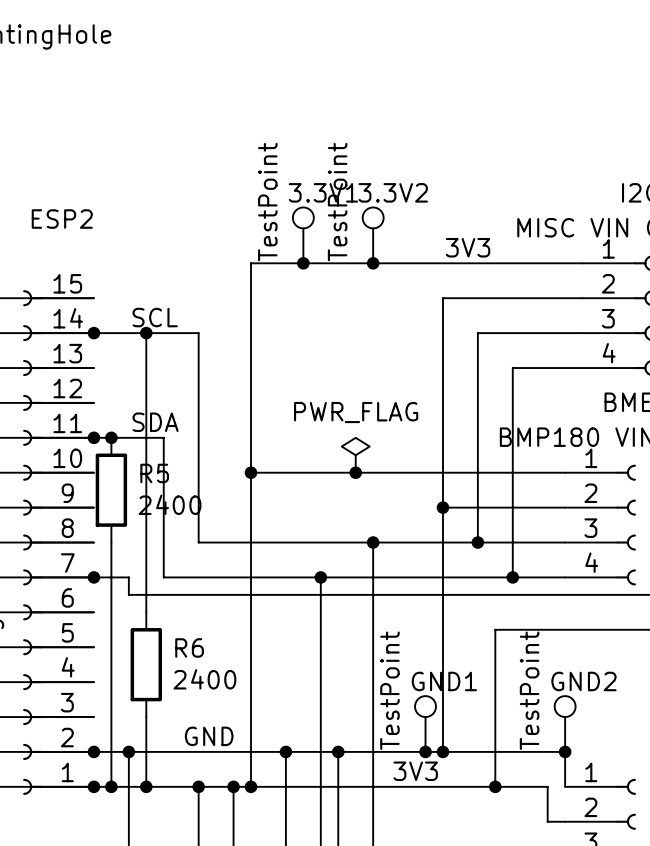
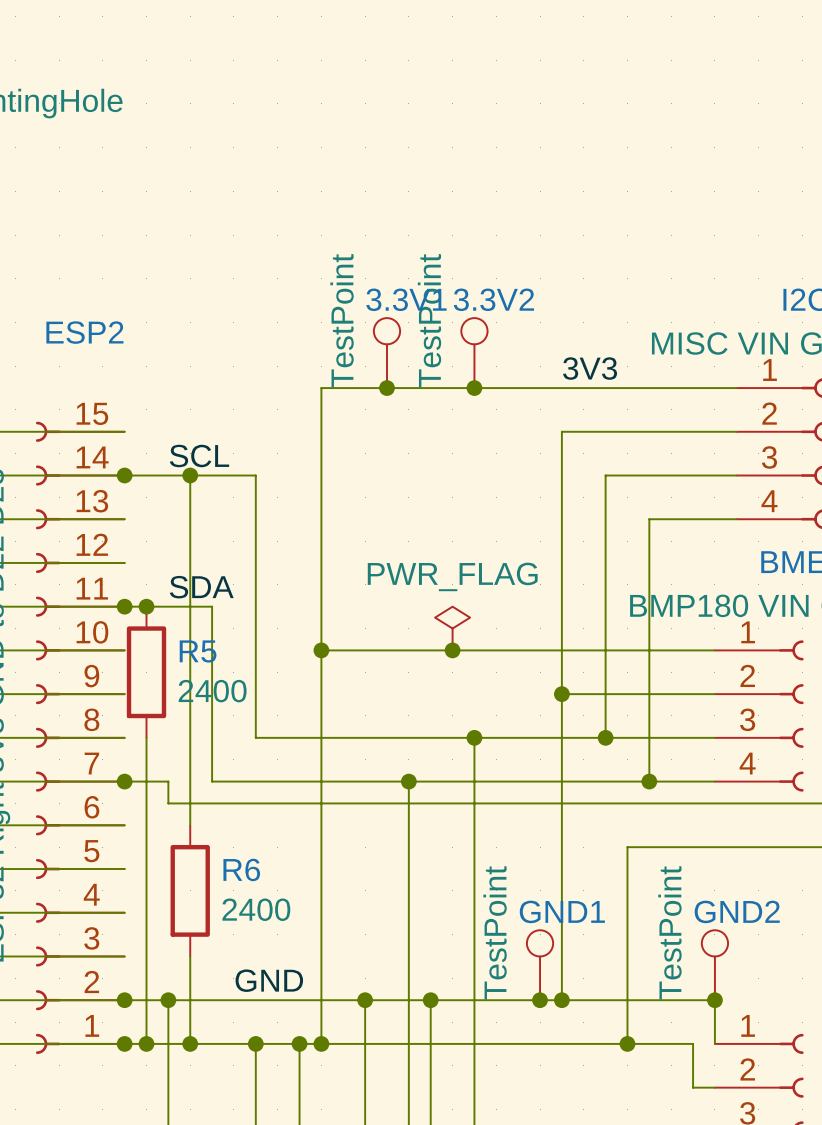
label: 3V3 (415, 771) -> none

